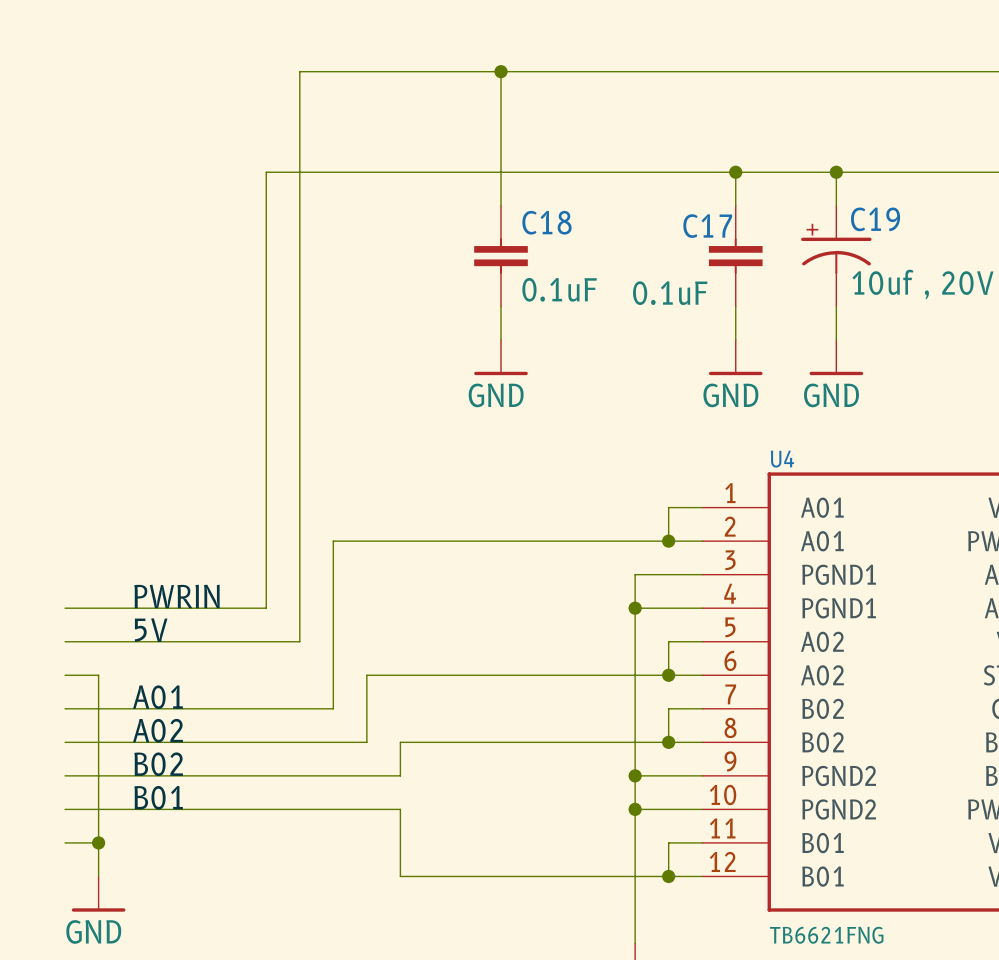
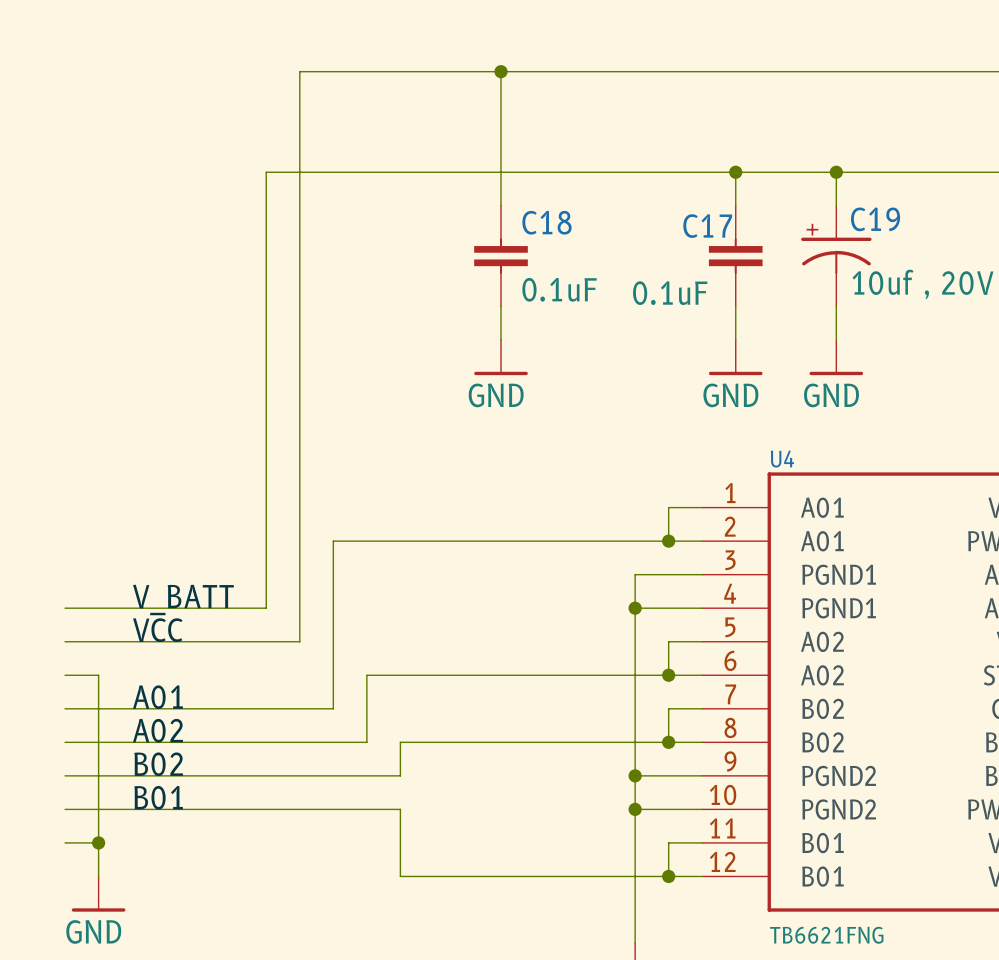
label: PWRIN (176, 596) -> V_BATT (183, 599)
label: 5V (151, 630) -> VCC (157, 630)

